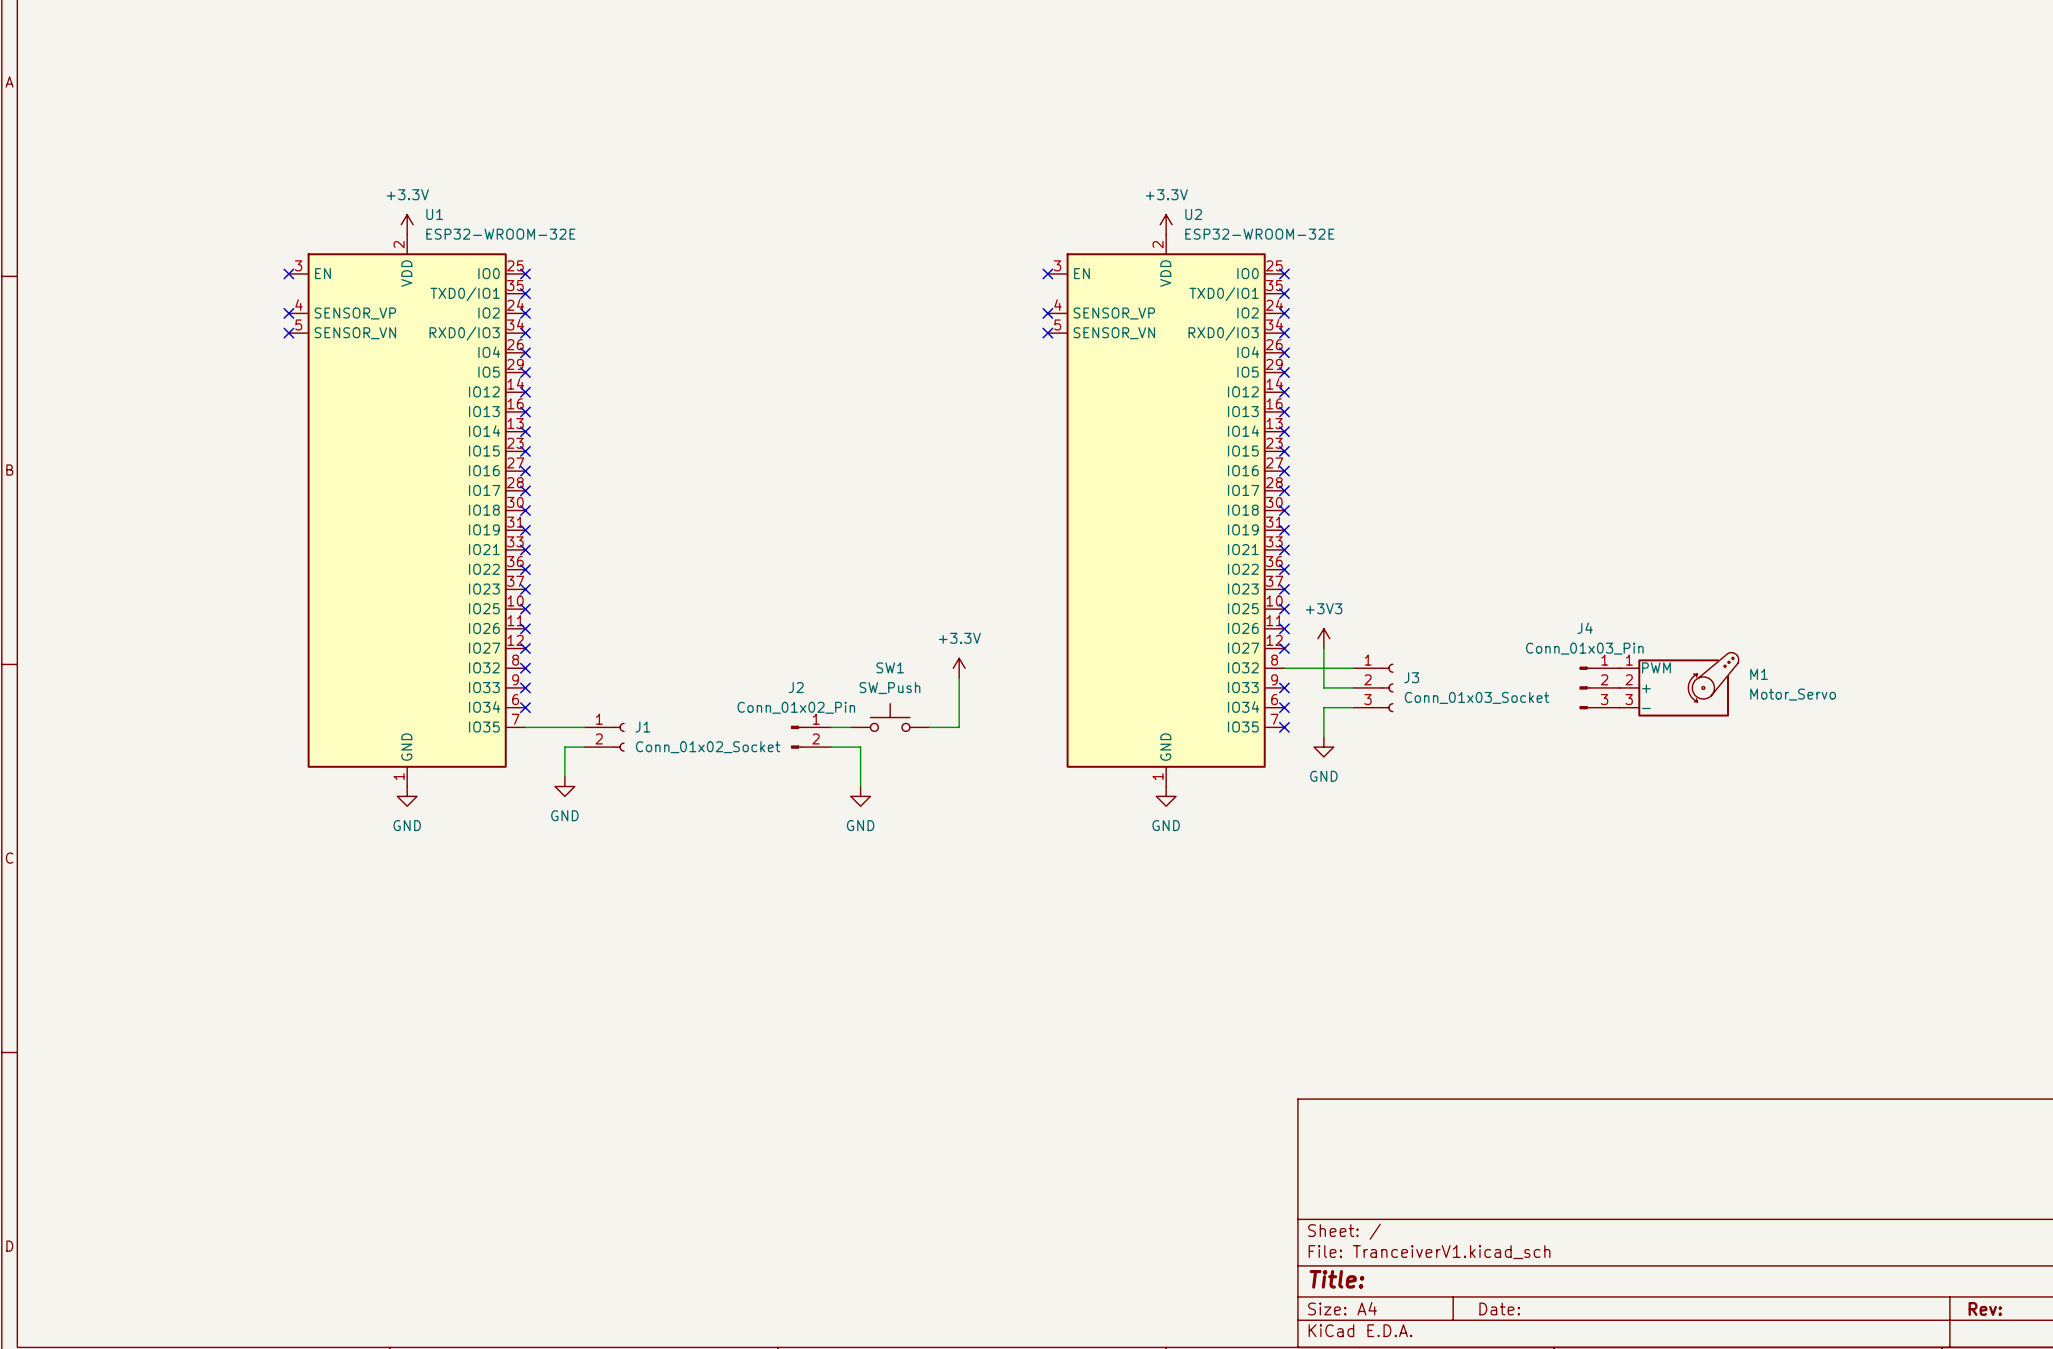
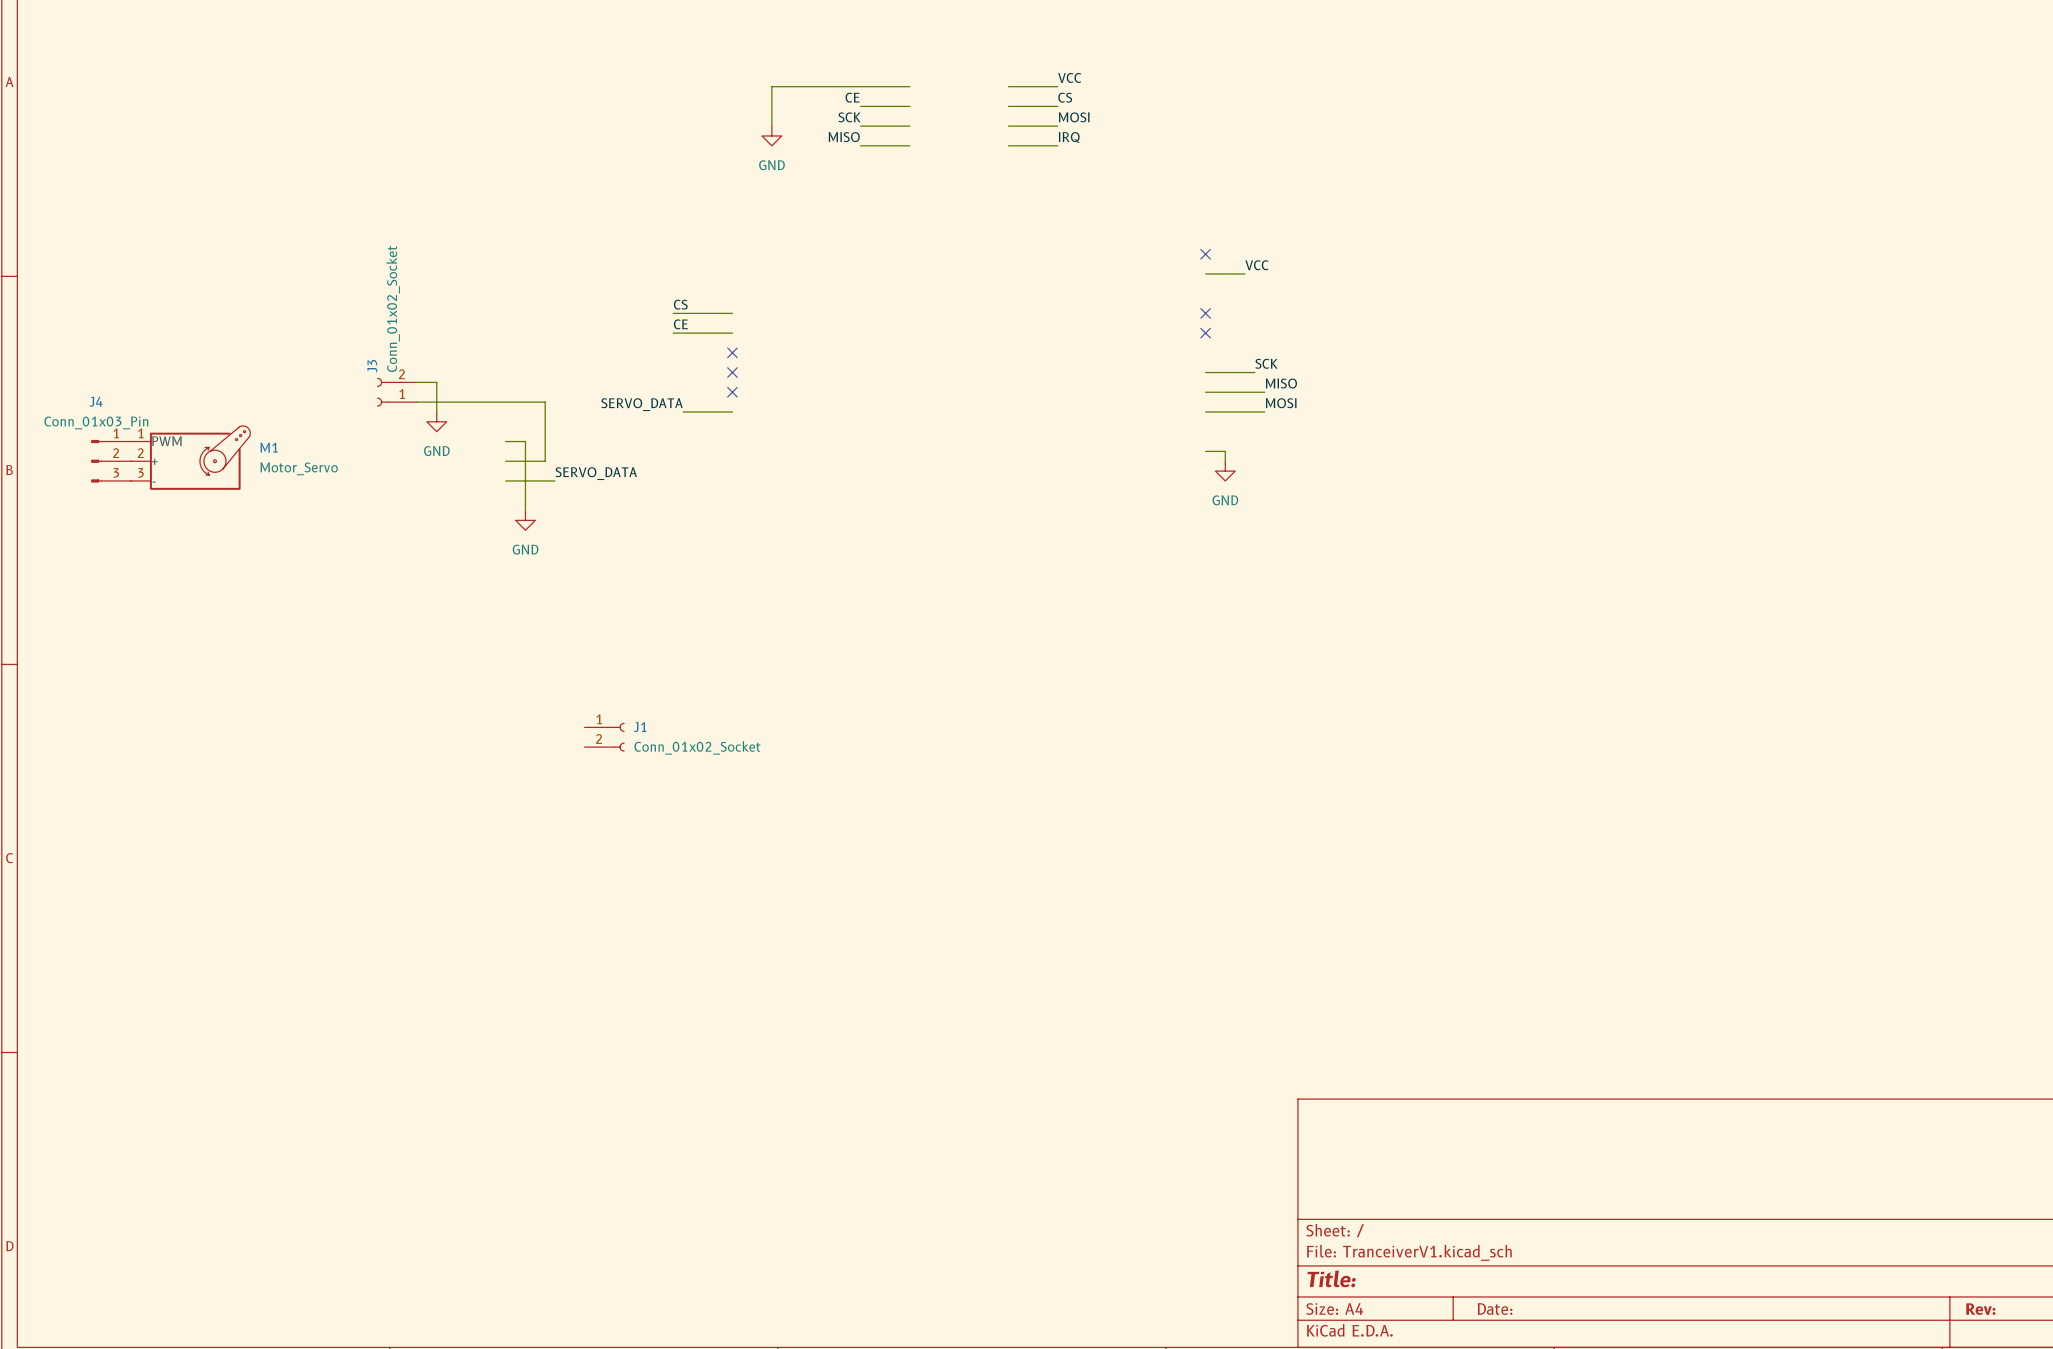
label: none -> VCC (1069, 77)
wire: none -> (909, 86) (771, 86) (771, 126)
wire: none -> (1008, 86) (1057, 86)
label: none -> CE (852, 97)
label: none -> CS (1065, 97)
wire: none -> (860, 106) (909, 106)
wire: none -> (1008, 106) (1057, 106)
label: none -> SCK (849, 117)
label: none -> MOSI (1074, 117)
wire: none -> (860, 126) (909, 126)
wire: none -> (1008, 126) (1057, 126)
power symbol: none -> GND (771, 135)
label: none -> MISO (844, 137)
label: none -> IRQ (1069, 137)
wire: none -> (860, 145) (909, 145)
wire: none -> (1008, 145) (1057, 145)
power symbol: +3.3V (407, 224) -> none
power symbol: +3.3V (1166, 224) -> none
no-connect mark: none -> (1205, 254)
label: none -> VCC (1256, 265)
no-connect mark: (288, 273) -> none
no-connect mark: (525, 273) -> none
no-connect mark: (1047, 273) -> none
no-connect mark: (1284, 273) -> none
no-connect mark: (525, 293) -> none
no-connect mark: (1284, 293) -> none
label: none -> CS (680, 304)
no-connect mark: (288, 313) -> none
no-connect mark: (525, 313) -> none
wire: none -> (673, 313) (732, 313)
no-connect mark: (1047, 313) -> none
no-connect mark: none -> (1205, 313)
no-connect mark: (1284, 313) -> none
label: none -> CE (680, 324)
no-connect mark: (288, 333) -> none
no-connect mark: (525, 333) -> none
wire: none -> (673, 333) (732, 333)
no-connect mark: (1047, 333) -> none
no-connect mark: none -> (1205, 333)
no-connect mark: (1284, 333) -> none
no-connect mark: (525, 352) -> none
no-connect mark: none -> (732, 352)
no-connect mark: (1284, 352) -> none
label: none -> SCK (1266, 363)
no-connect mark: (525, 372) -> none
no-connect mark: none -> (732, 372)
no-connect mark: (1284, 372) -> none
label: none -> MISO (1281, 383)
no-connect mark: (525, 392) -> none
no-connect mark: none -> (732, 392)
no-connect mark: (1284, 392) -> none
wire: none -> (417, 402) (545, 402) (545, 461) (505, 461)
label: none -> SERVO_DATA (642, 404)
label: none -> MOSI (1281, 403)
no-connect mark: (525, 411) -> none
wire: none -> (683, 411) (732, 411)
no-connect mark: (1284, 411) -> none
power symbol: none -> GND (436, 421)
no-connect mark: (525, 431) -> none
no-connect mark: (1284, 431) -> none
wire: none -> (505, 441) (525, 441) (525, 510)
no-connect mark: (525, 451) -> none
no-connect mark: (1284, 451) -> none
no-connect mark: (525, 471) -> none
power symbol: none -> GND (1225, 471)
no-connect mark: (1284, 471) -> none
label: none -> SERVO_DATA (596, 473)
wire: none -> (505, 480) (555, 480)
no-connect mark: (525, 490) -> none
no-connect mark: (1284, 490) -> none
U1: ESP32-WROOM-32E (407, 510) -> none
no-connect mark: (525, 510) -> none
U2: ESP32-WROOM-32E (1166, 510) -> none
no-connect mark: (1284, 510) -> none
power symbol: none -> GND (525, 520)
no-connect mark: (525, 530) -> none
no-connect mark: (1284, 530) -> none
no-connect mark: (525, 549) -> none
no-connect mark: (1284, 549) -> none
no-connect mark: (525, 569) -> none
no-connect mark: (1284, 569) -> none
no-connect mark: (525, 589) -> none
no-connect mark: (1284, 589) -> none
no-connect mark: (525, 609) -> none
no-connect mark: (1284, 609) -> none
no-connect mark: (525, 628) -> none
no-connect mark: (1284, 628) -> none
power symbol: +3V3 (1323, 638) -> none
no-connect mark: (525, 648) -> none
no-connect mark: (1284, 648) -> none
wire: (1323, 648) (1323, 687) (1353, 687) -> none
J3 symbol: [1353, 663, 1394, 713] -> [377, 377, 418, 407]
no-connect mark: (525, 668) -> none
power symbol: +3.3V (959, 668) -> none
wire: (1284, 668) (1353, 668) -> none
J3 name position: J3 (1411, 677) -> J3 (372, 366)
wire: (959, 678) (959, 727) (929, 727) -> none
M1 position: (1679, 684) -> (190, 457)
no-connect mark: (525, 687) -> none
no-connect mark: (1284, 687) -> none
J4 position: (1599, 687) -> (111, 461)
J3 value: Conn_01x03_Socket (1476, 697) -> Conn_01x02_Socket (393, 308)
no-connect mark: (525, 707) -> none
no-connect mark: (1284, 707) -> none
wire: (1353, 707) (1323, 707) (1323, 737) -> none
SW1: SW_Push (890, 717) -> none
wire: (525, 727) (584, 727) -> none
wire: (831, 727) (850, 727) -> none
no-connect mark: (1284, 727) -> none
J2: Conn_01x02_Pin (811, 737) -> none
wire: (584, 747) (564, 747) (564, 776) -> none
wire: (831, 747) (860, 747) (860, 786) -> none
power symbol: GND (1323, 747) -> none
power symbol: GND (564, 786) -> none
power symbol: GND (407, 796) -> none
power symbol: GND (860, 796) -> none
power symbol: GND (1166, 796) -> none

